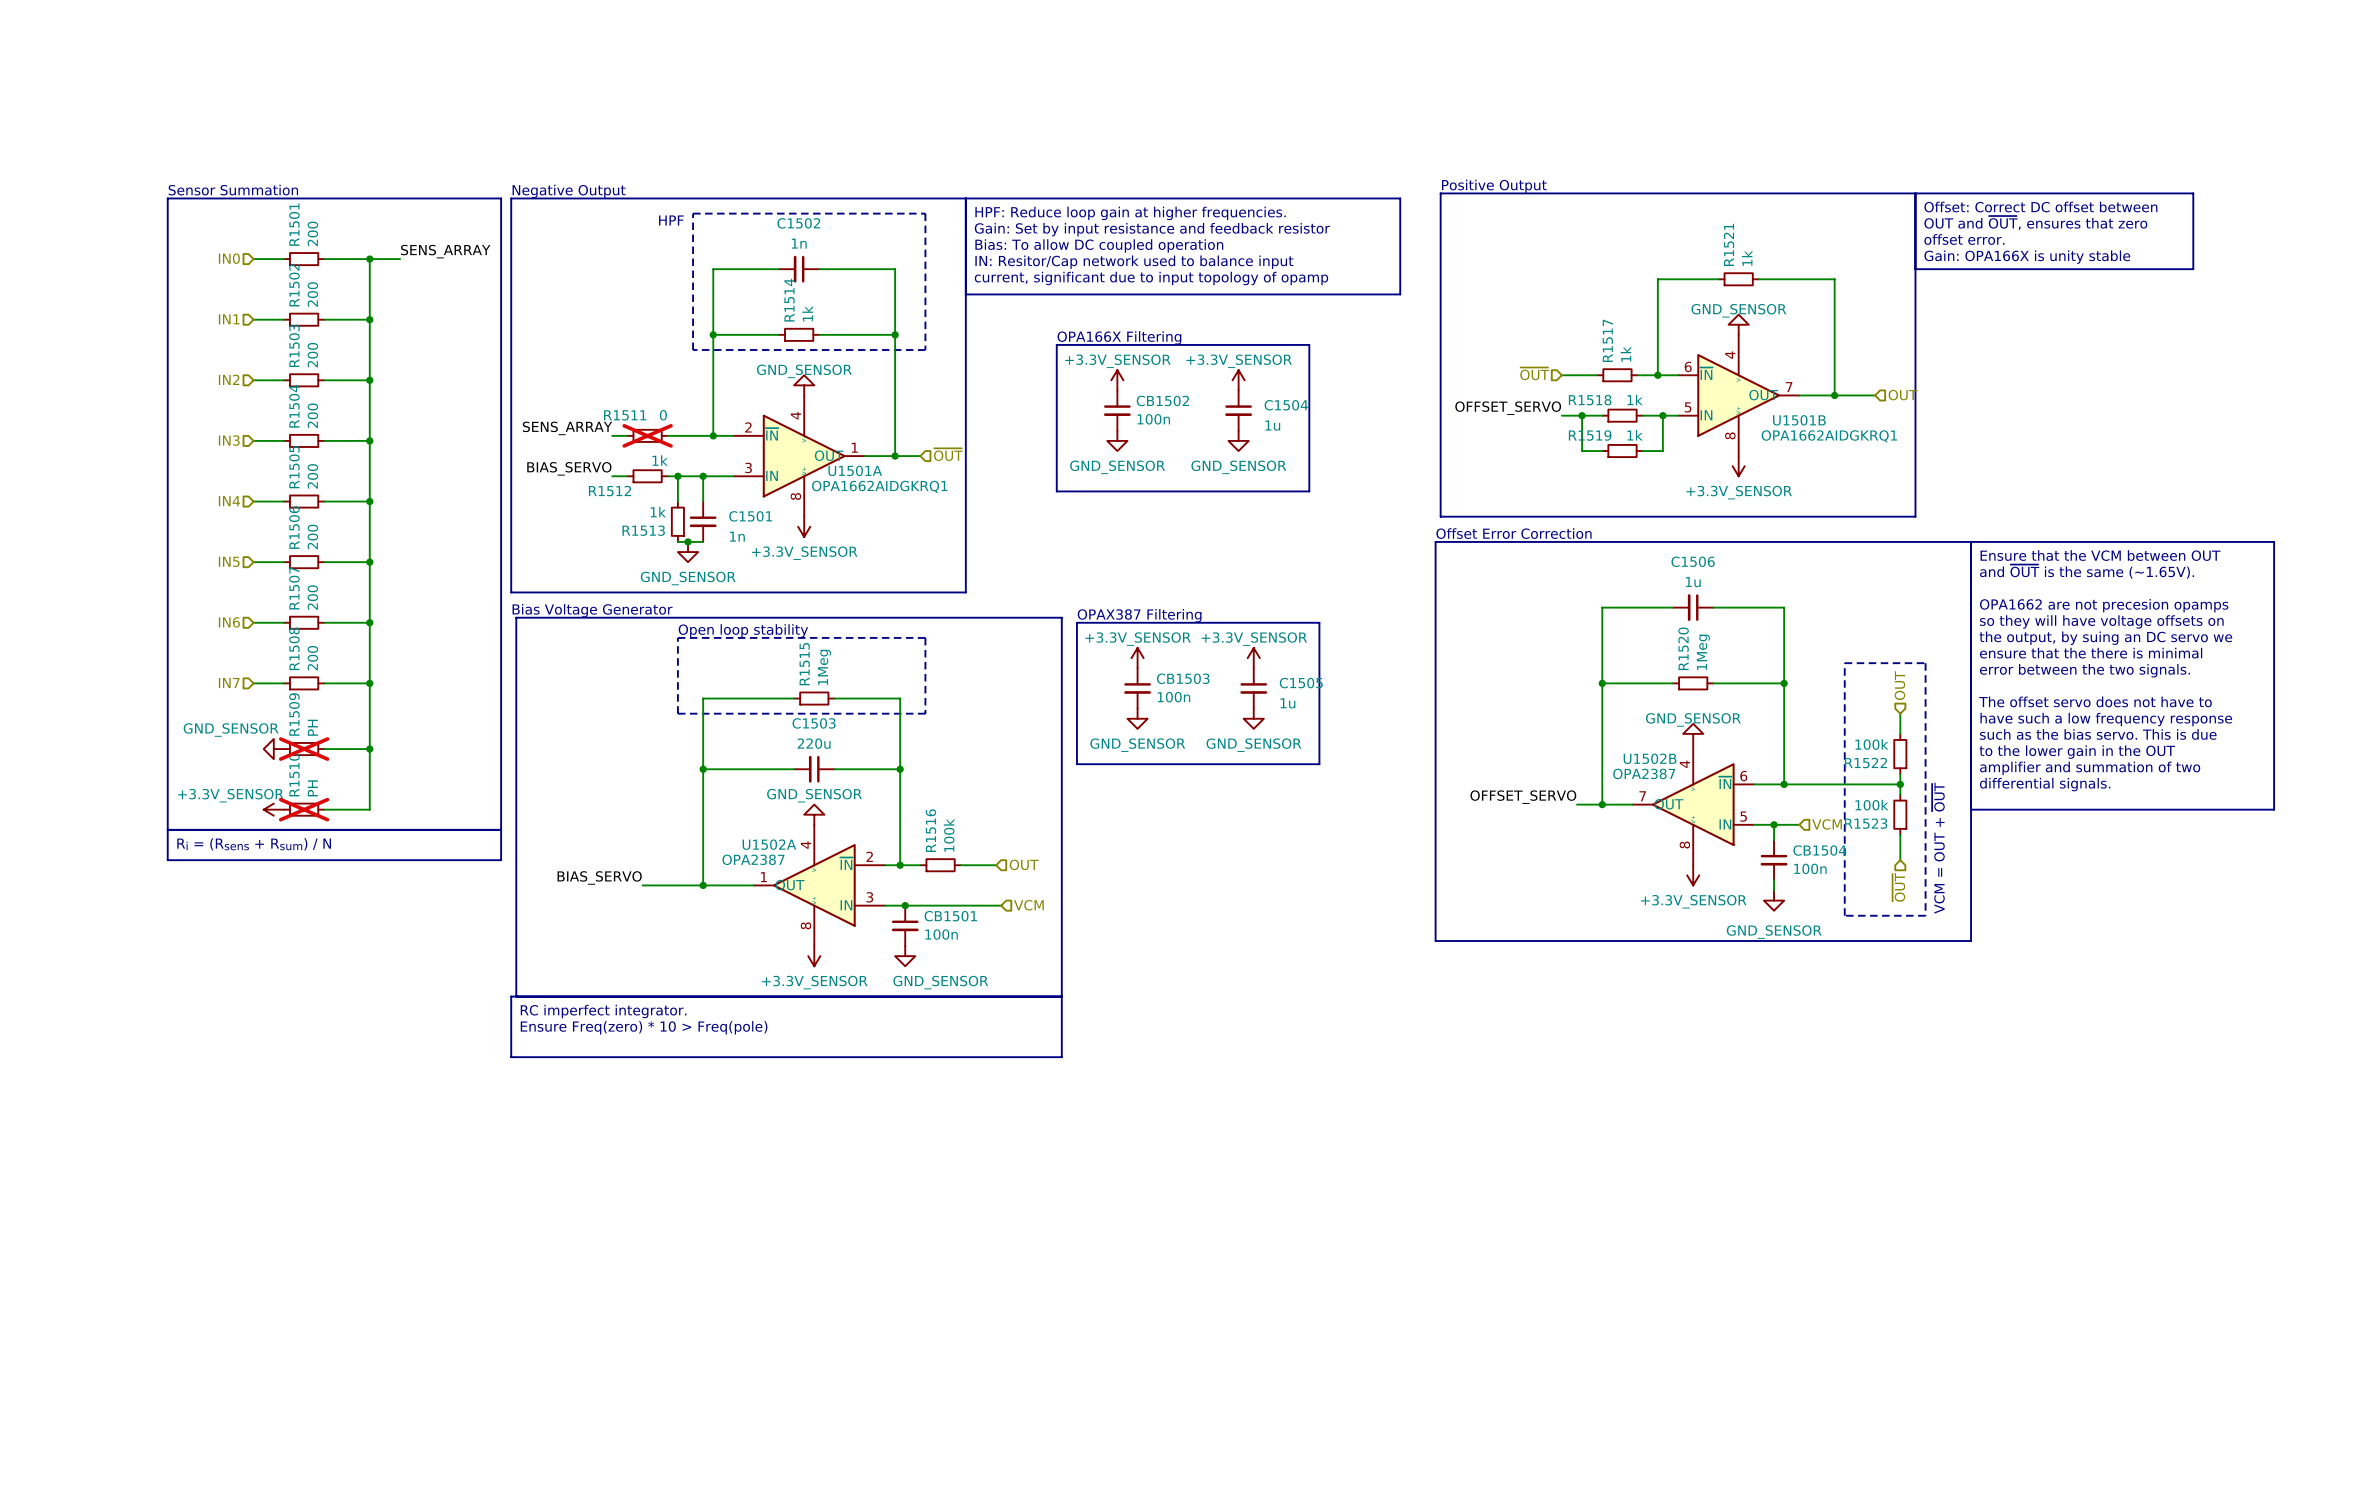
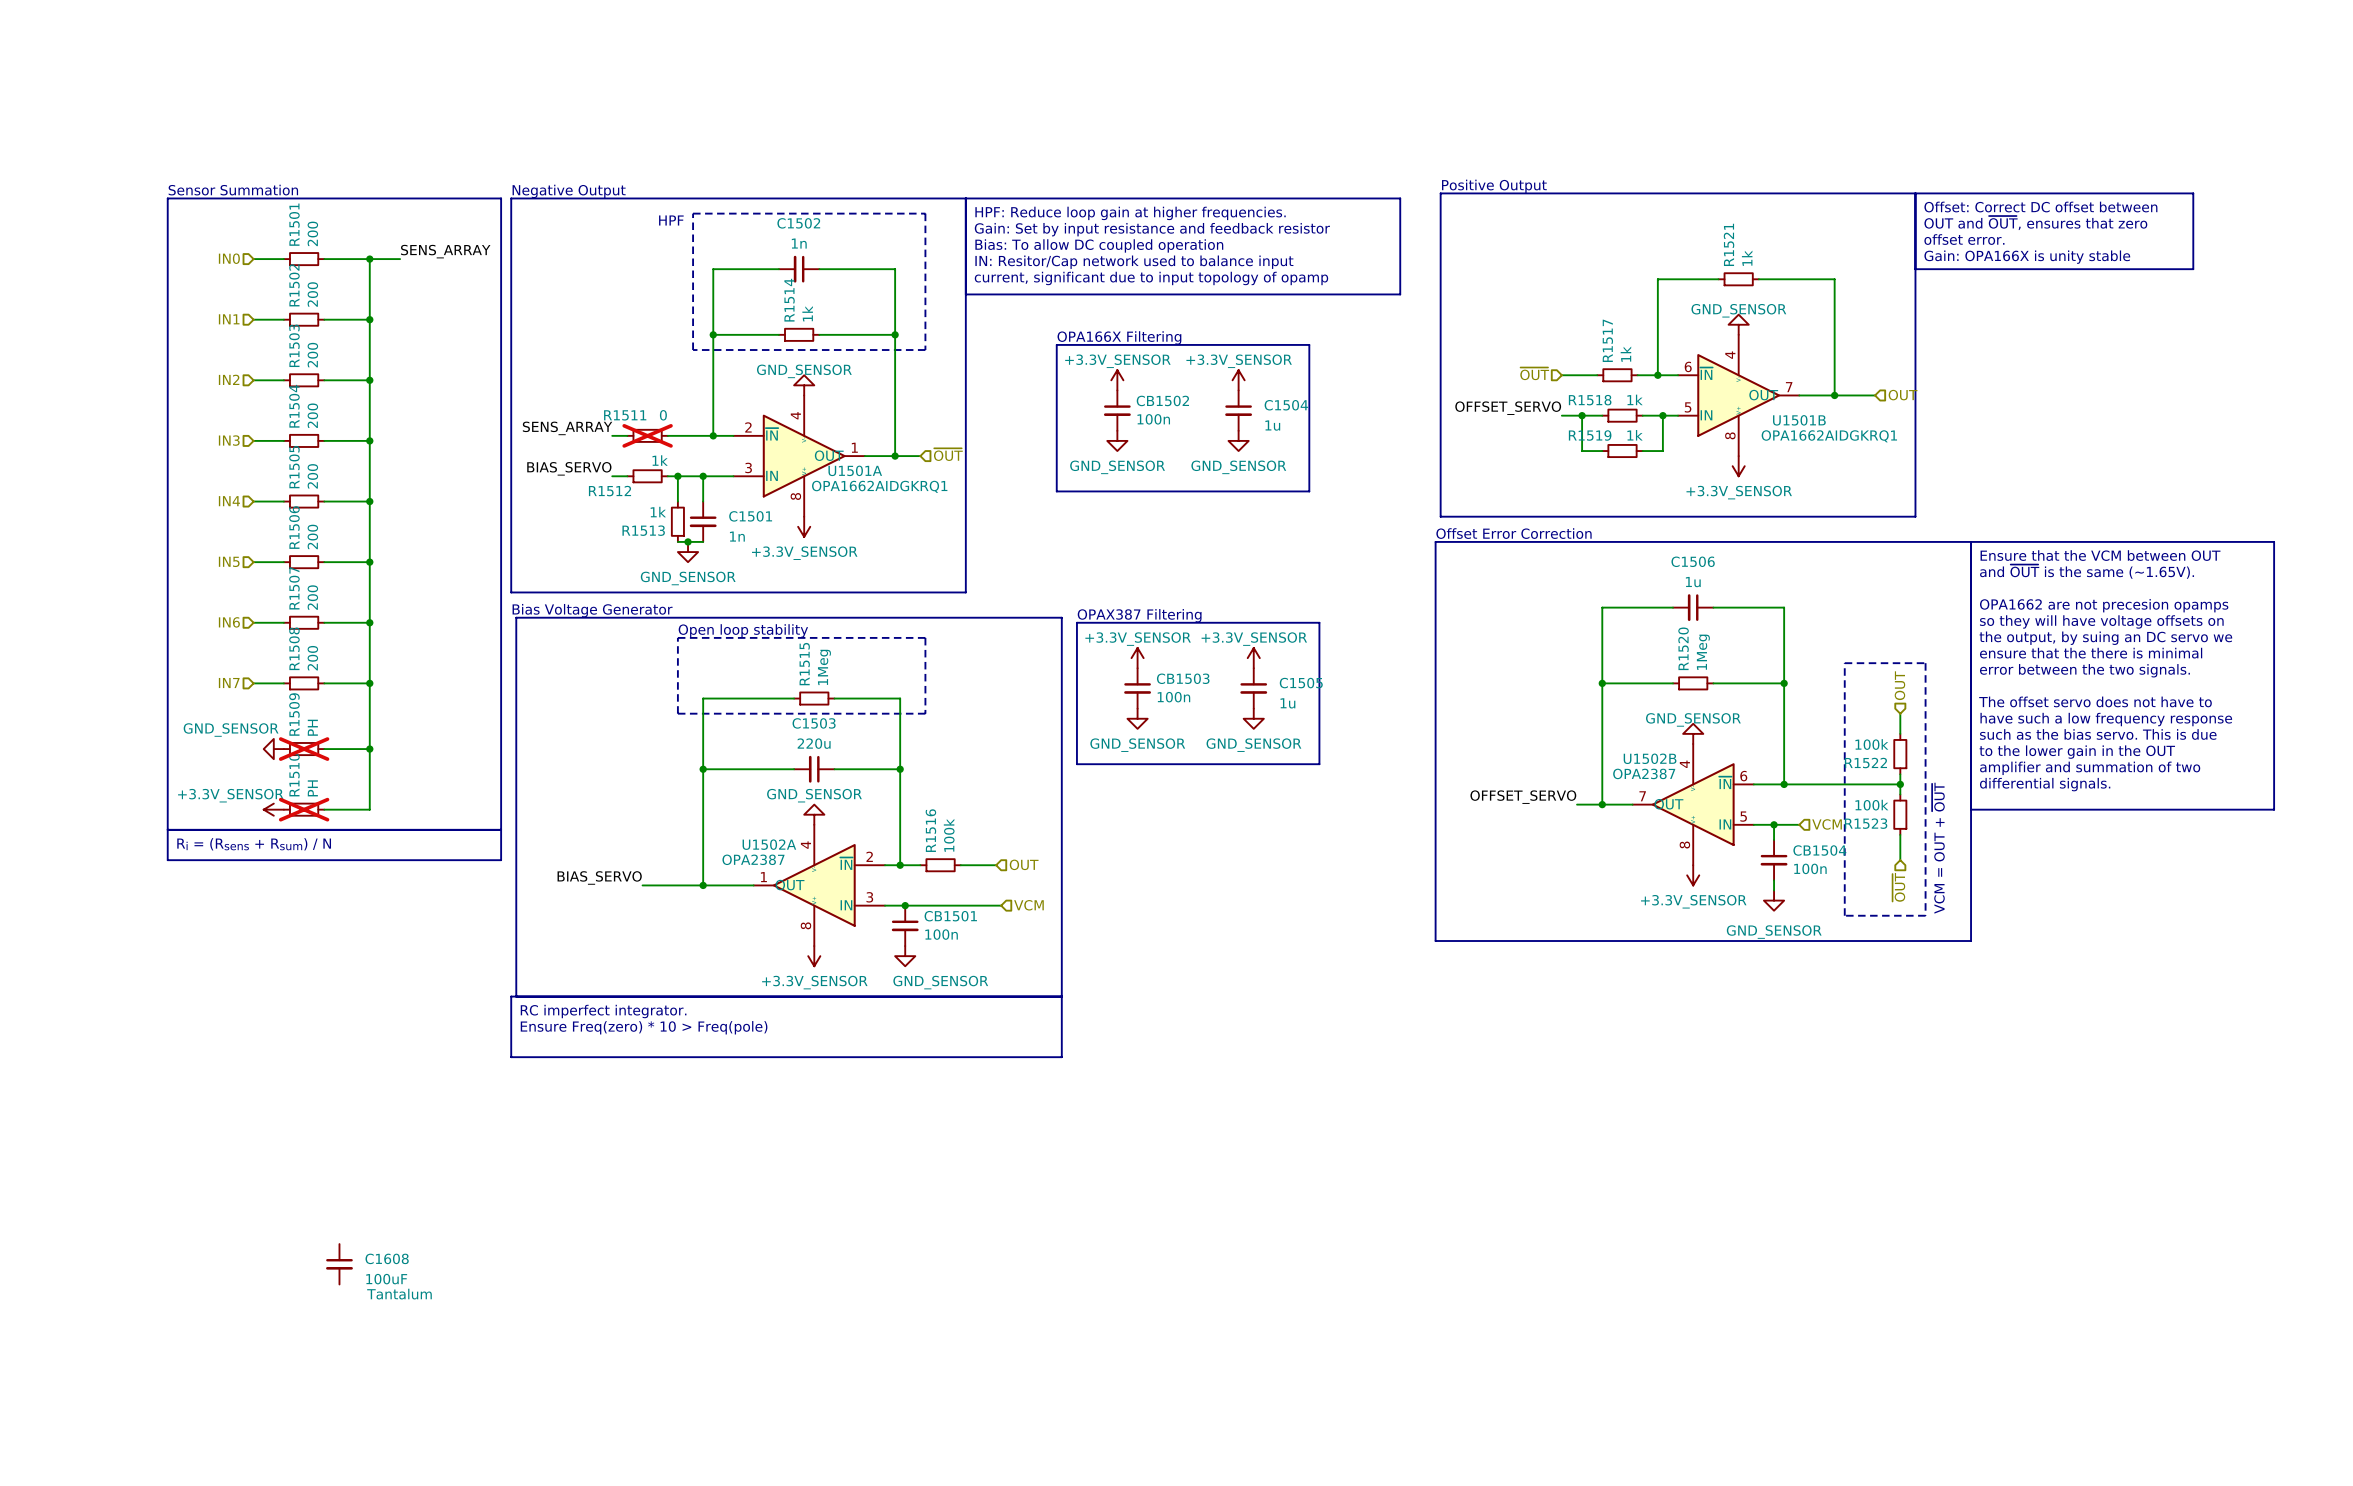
C1608: none -> 100uF (339, 1264)

